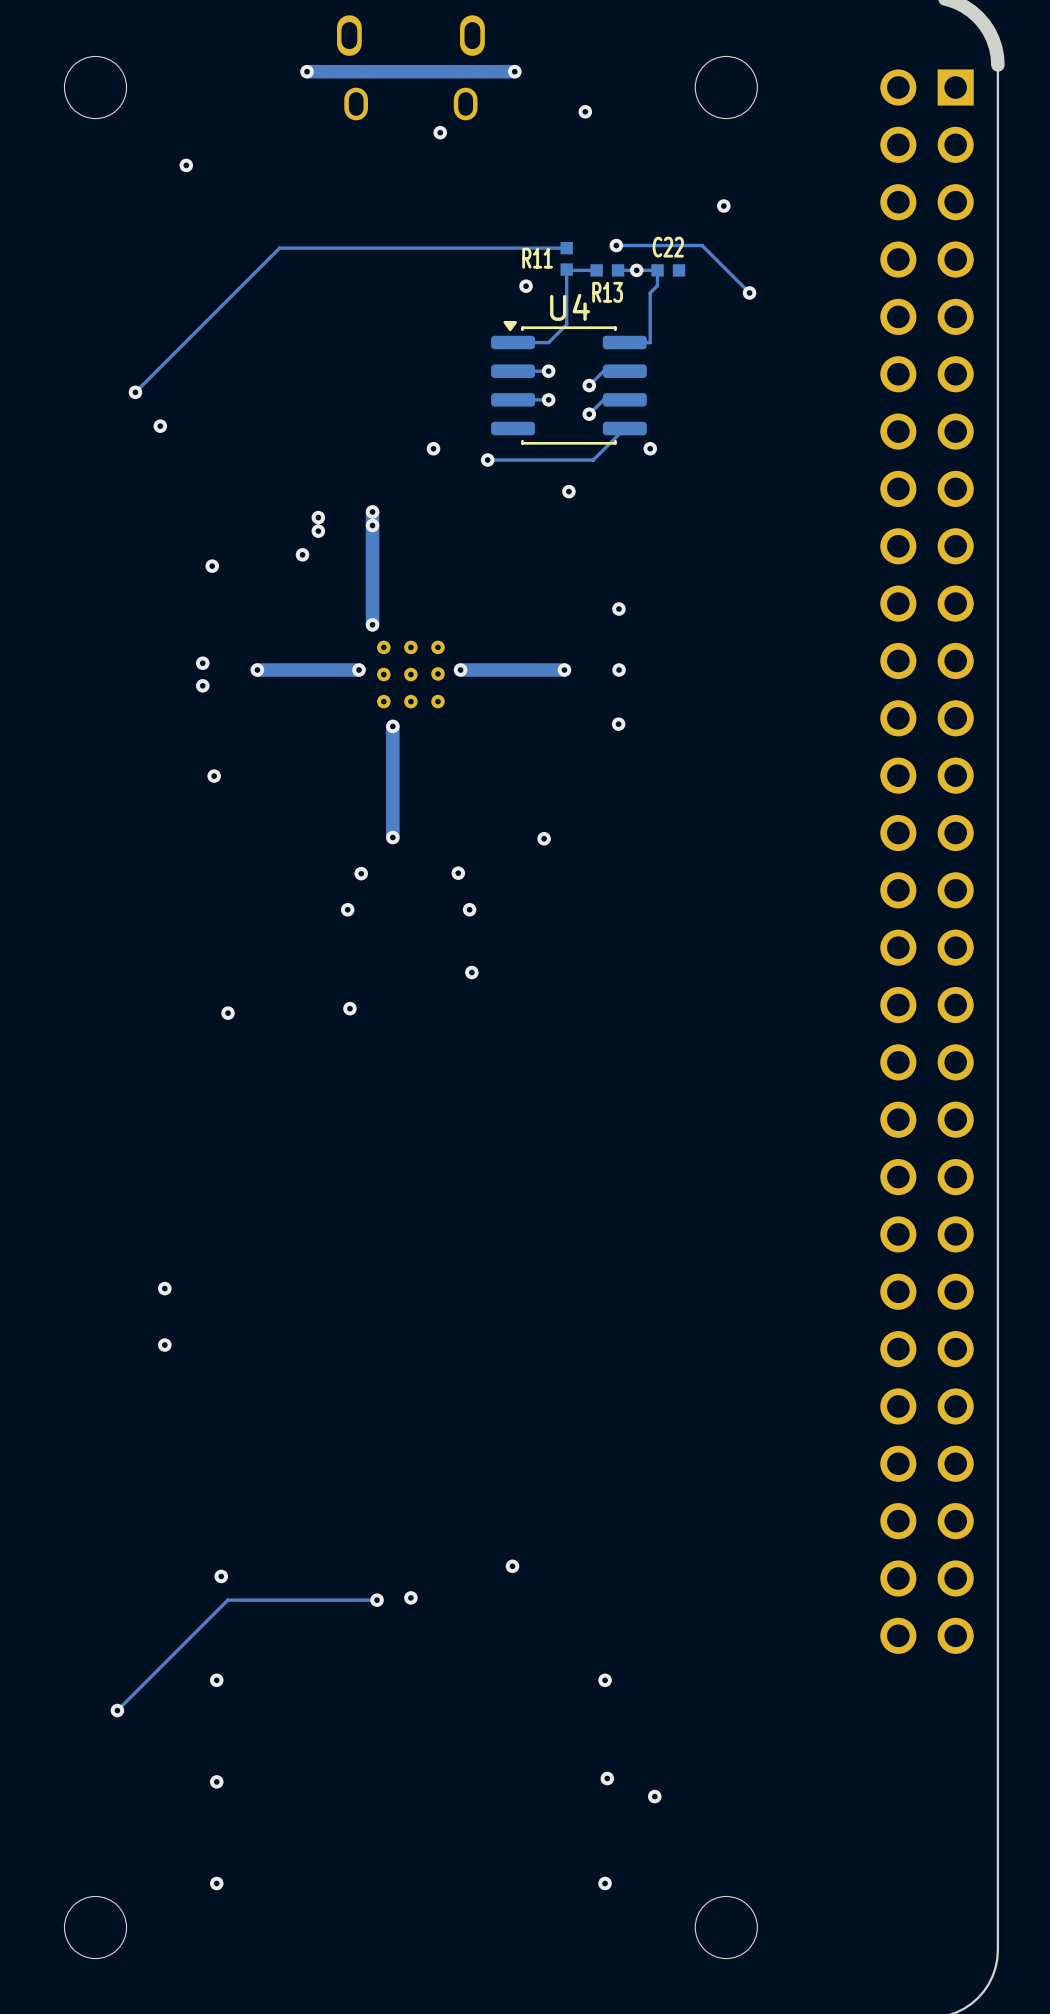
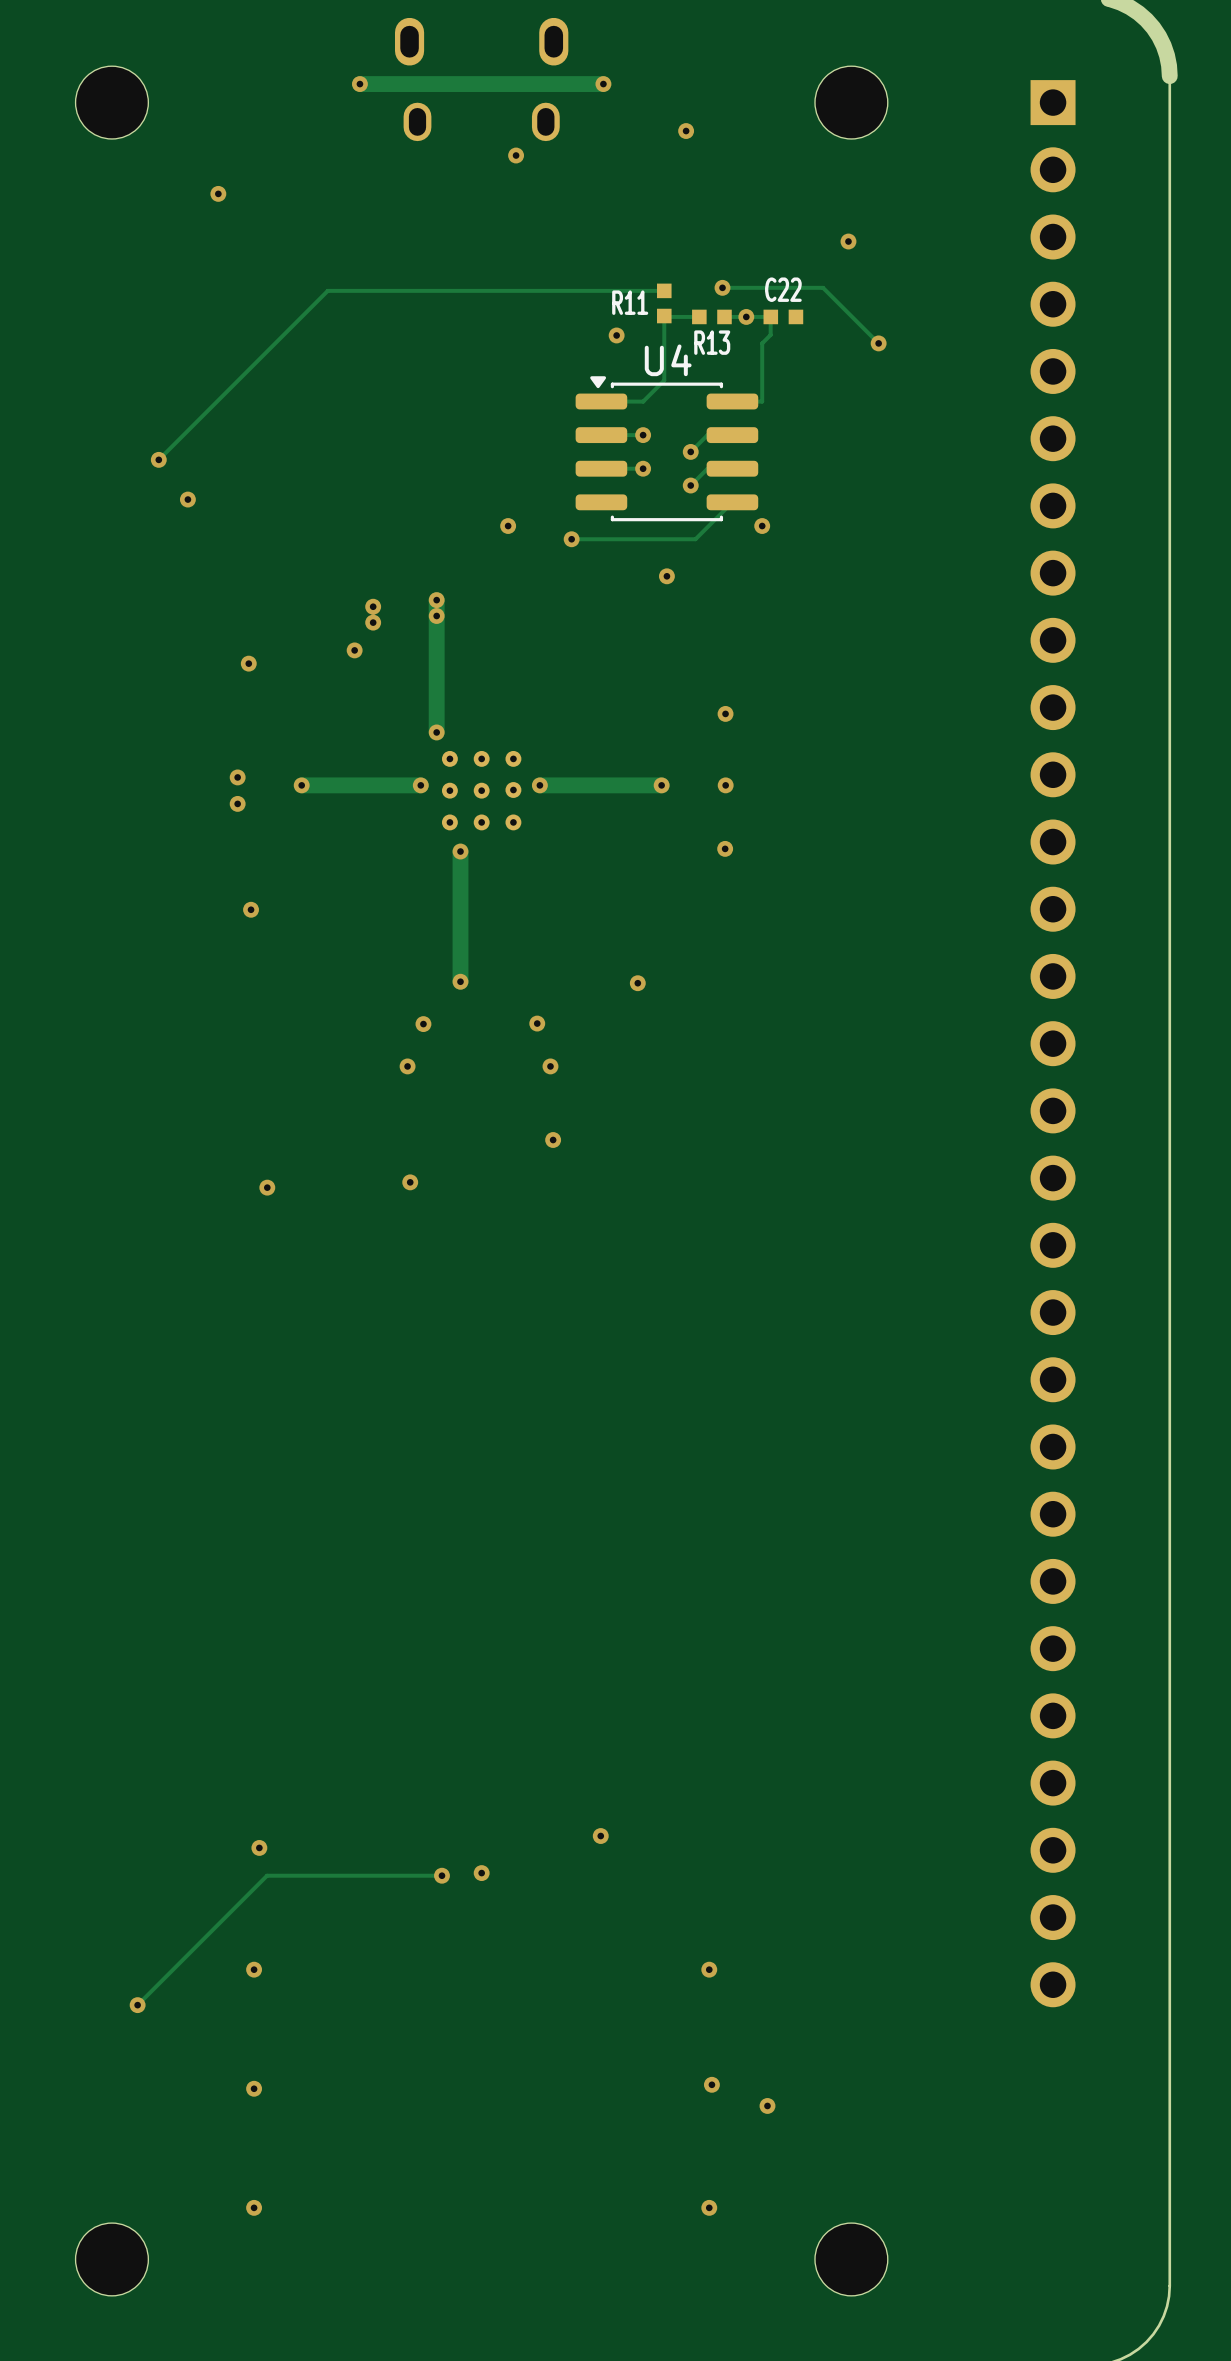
part: (927, 804) -> none
part: none -> (1053, 1043)
via: (164, 1288) -> none
via: (164, 1345) -> none
part: (927, 1607) -> none

